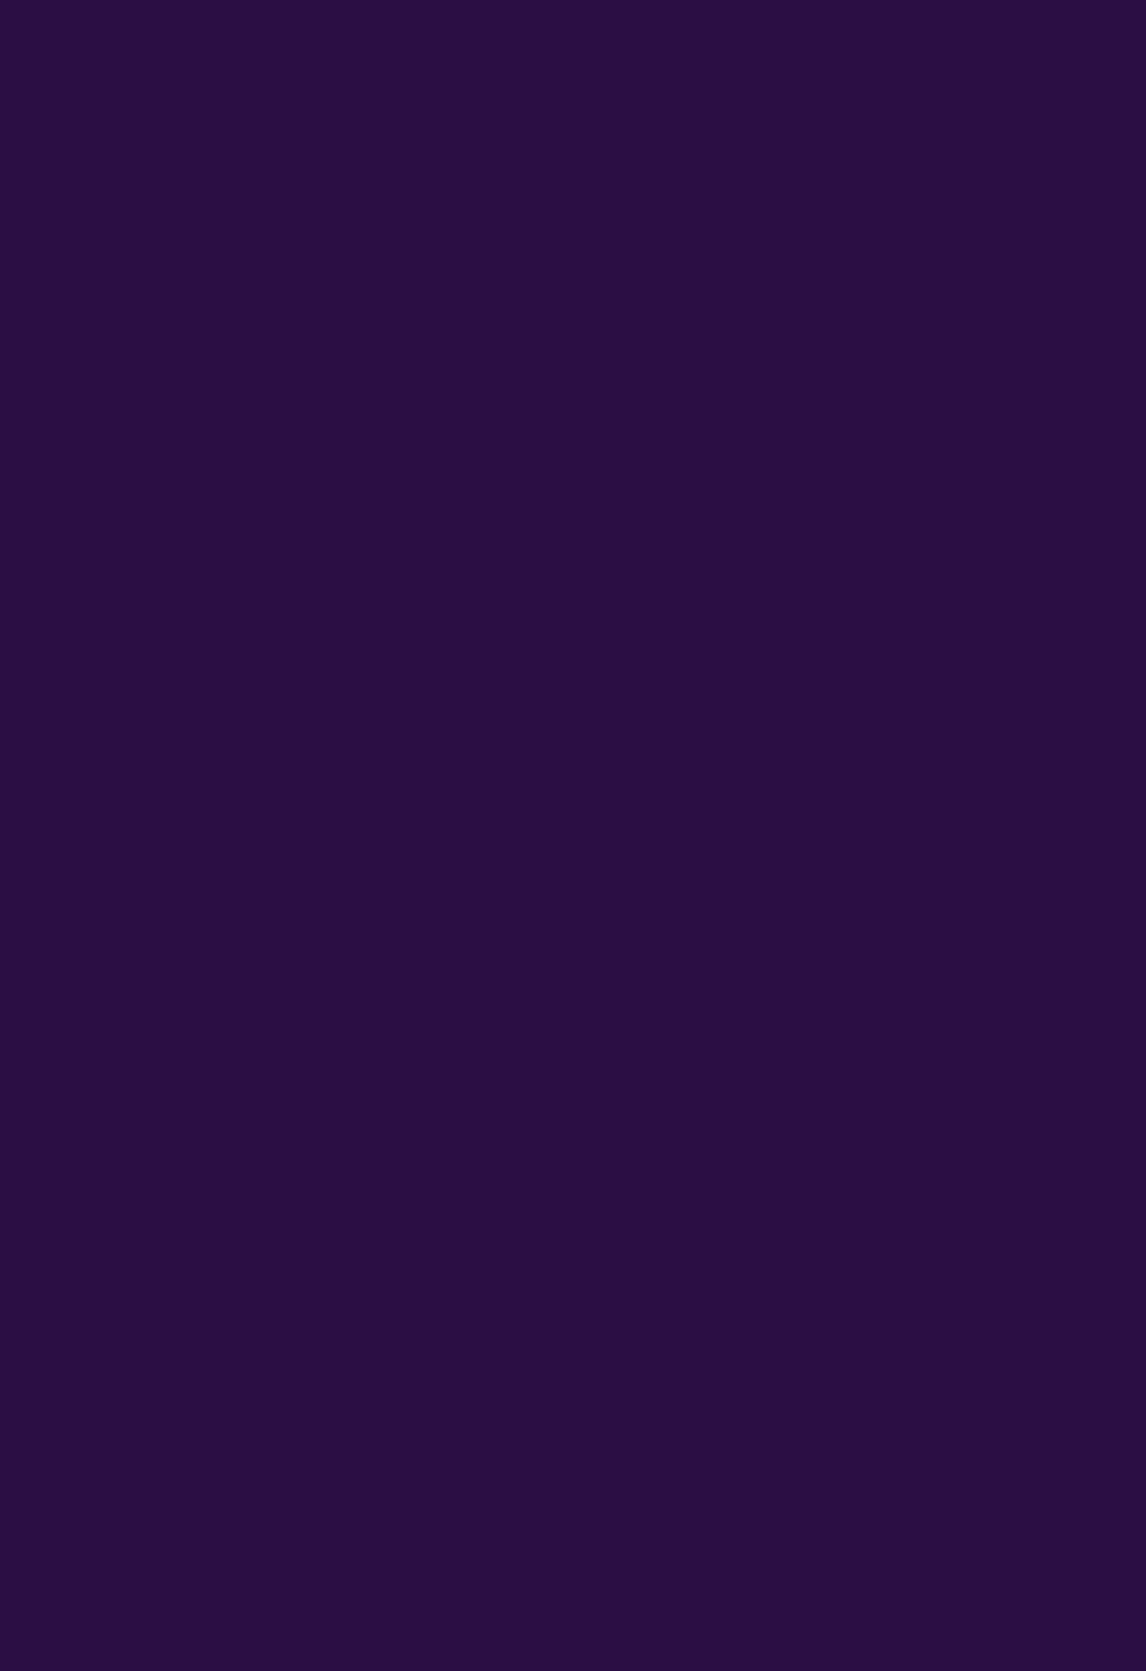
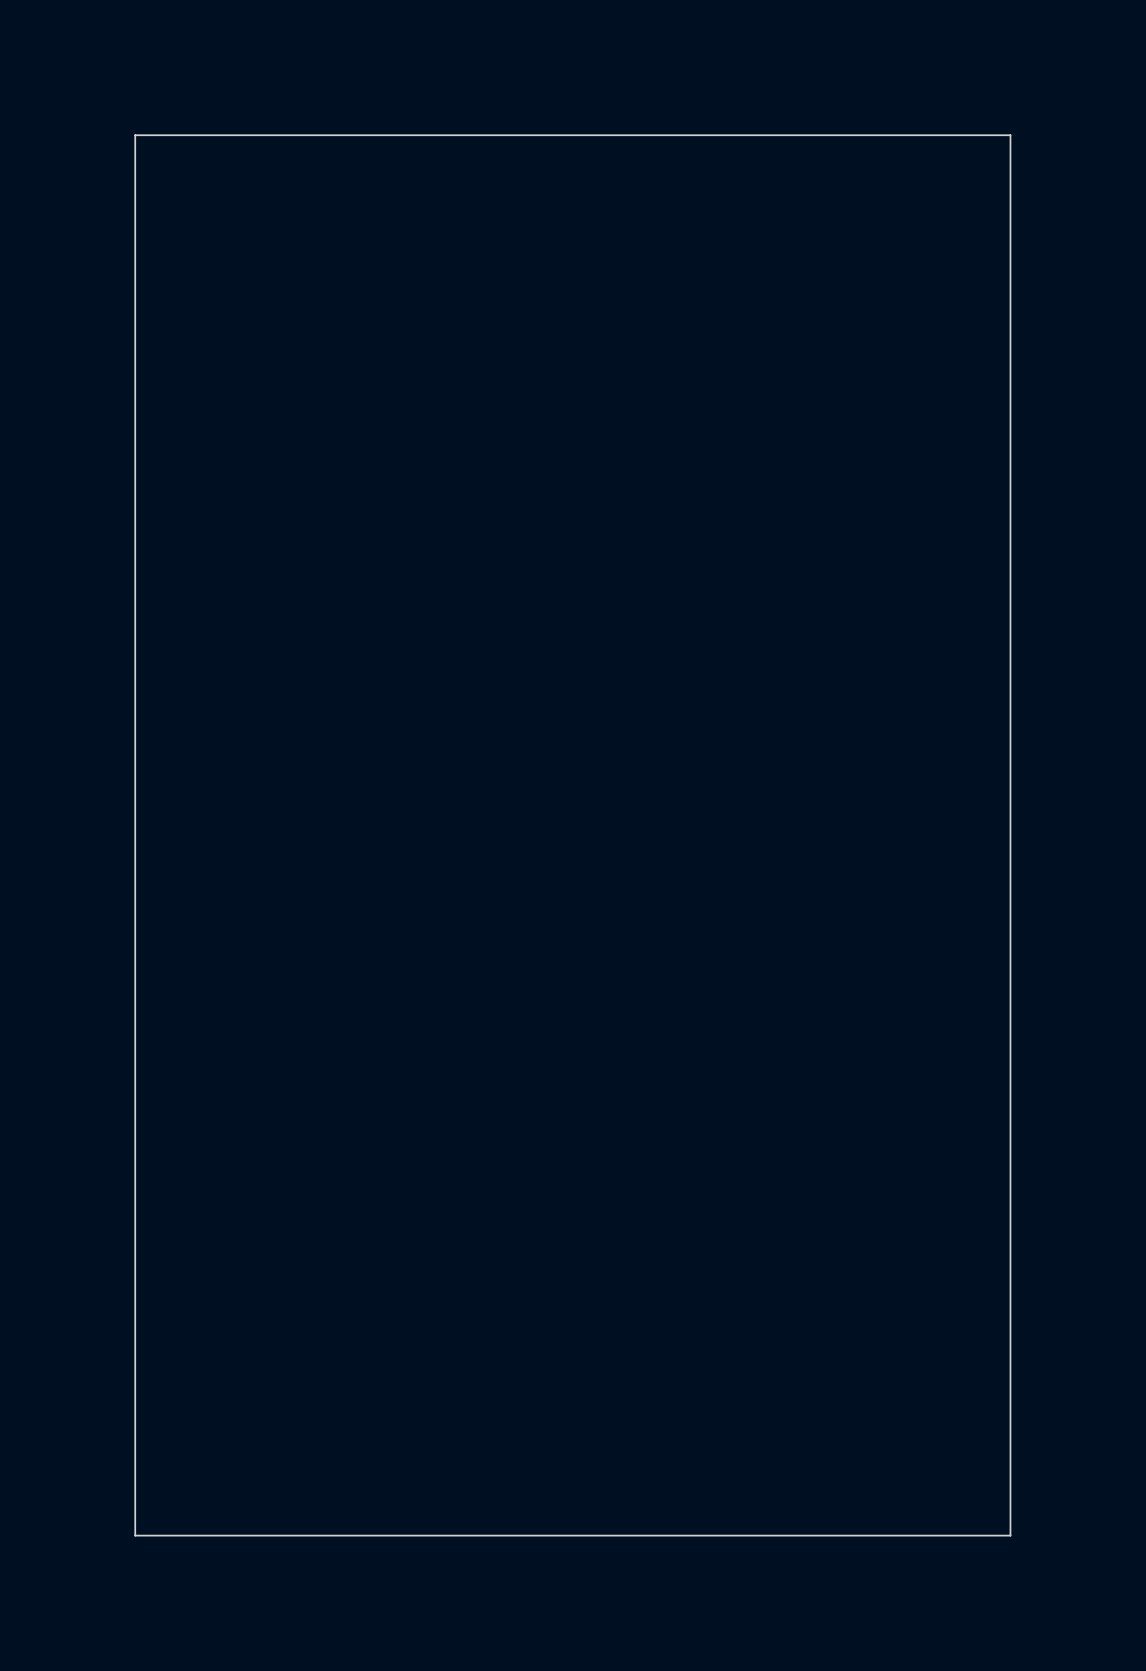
board edge: none -> (1010, 135) (135, 135) (135, 1535) (1010, 1535) (1010, 135)

